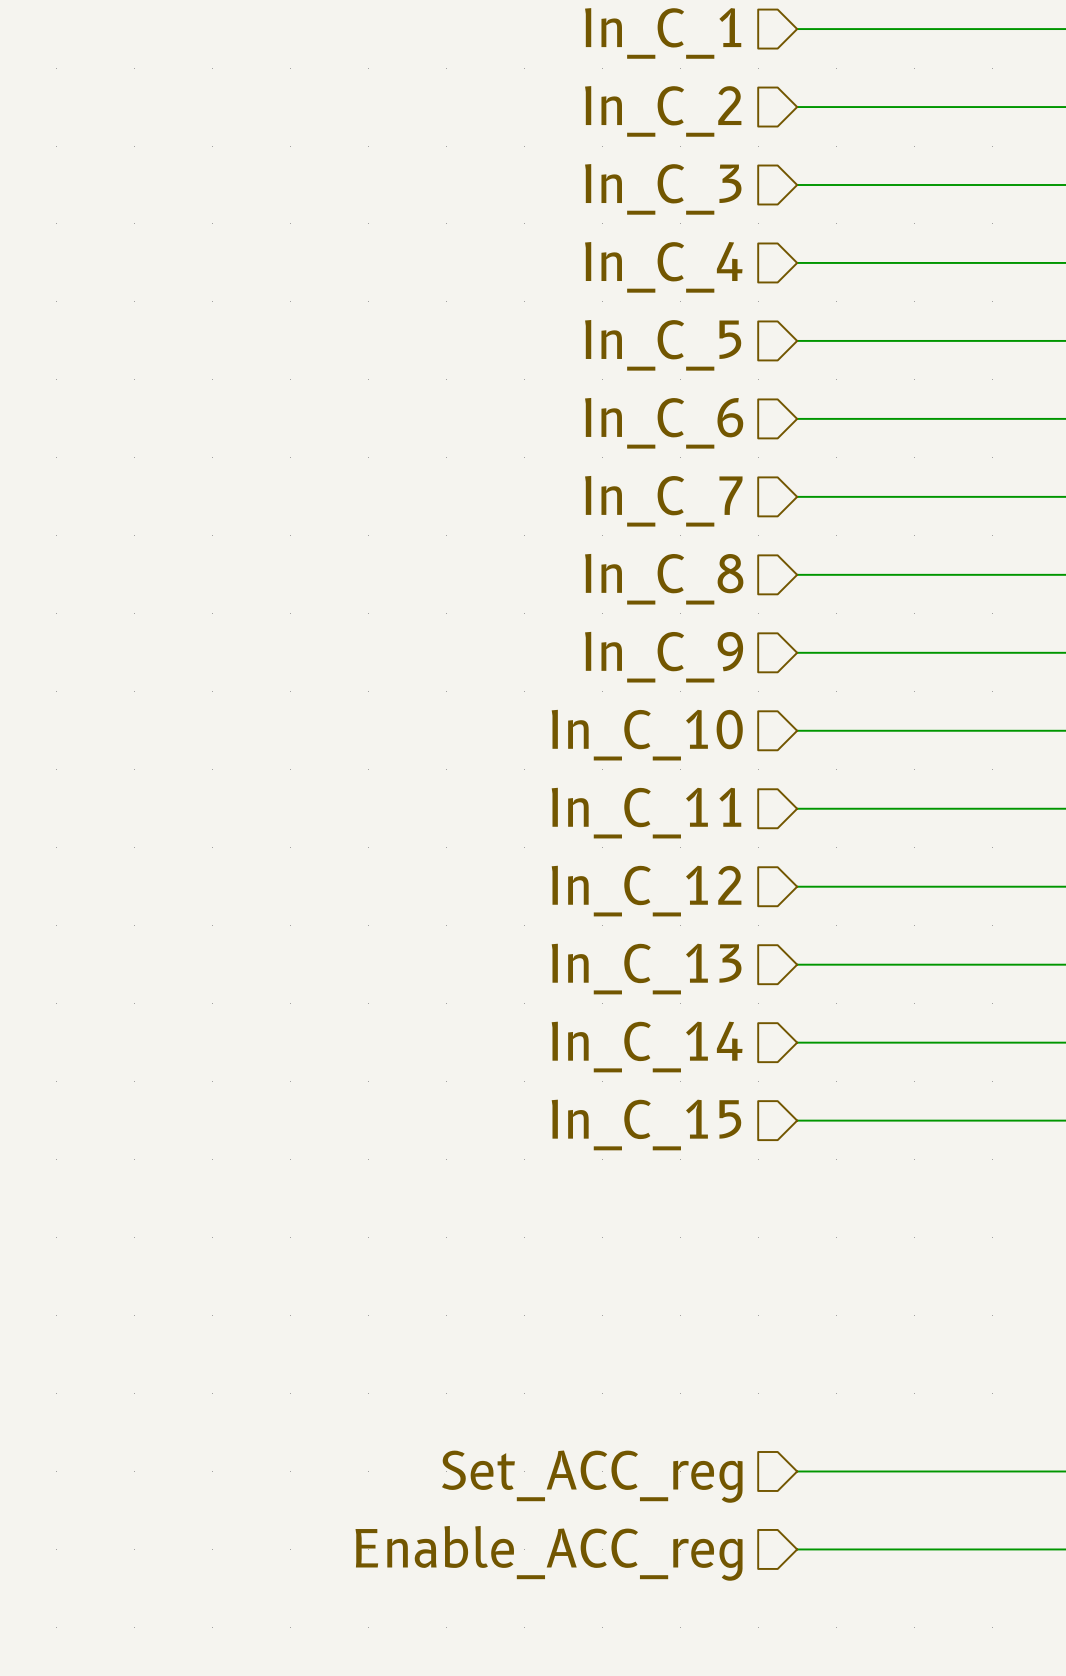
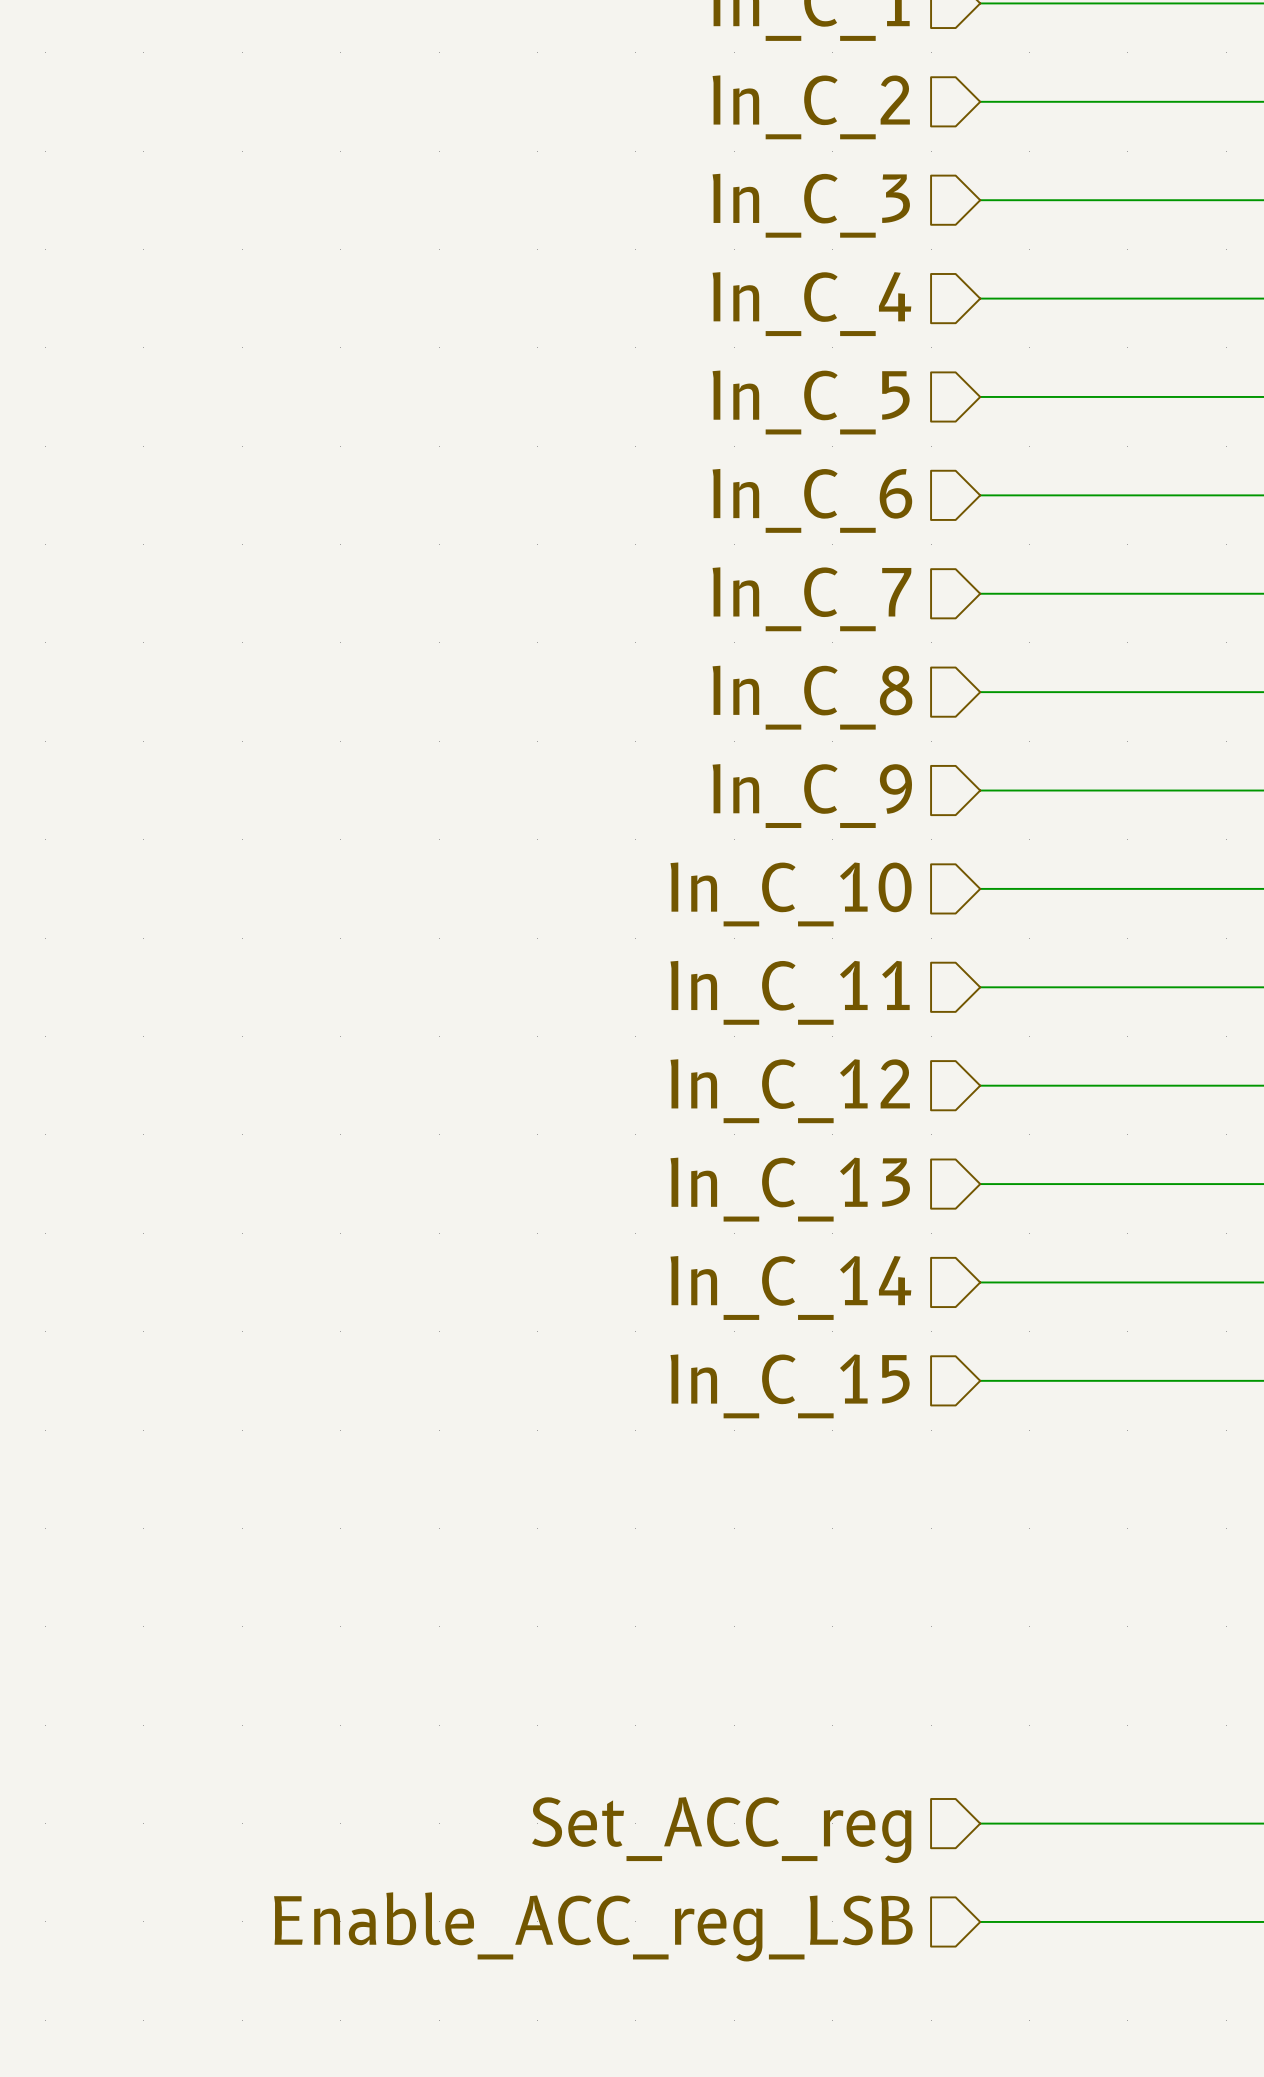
hierarchical label: Enable_ACC_reg (549, 1553) -> Enable_ACC_reg_LSB (593, 1926)

